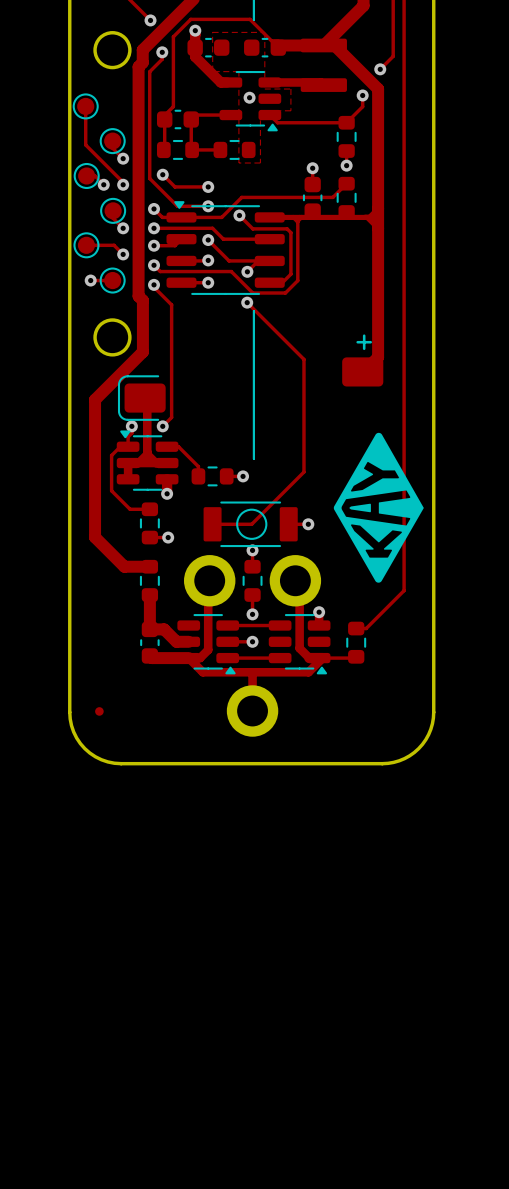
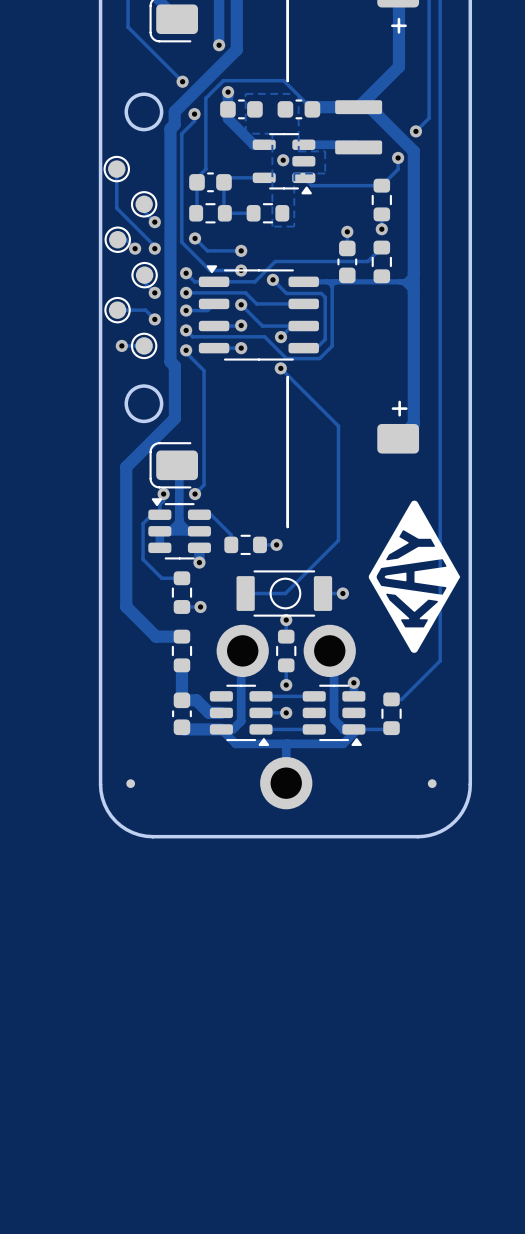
part: none -> (432, 783)

